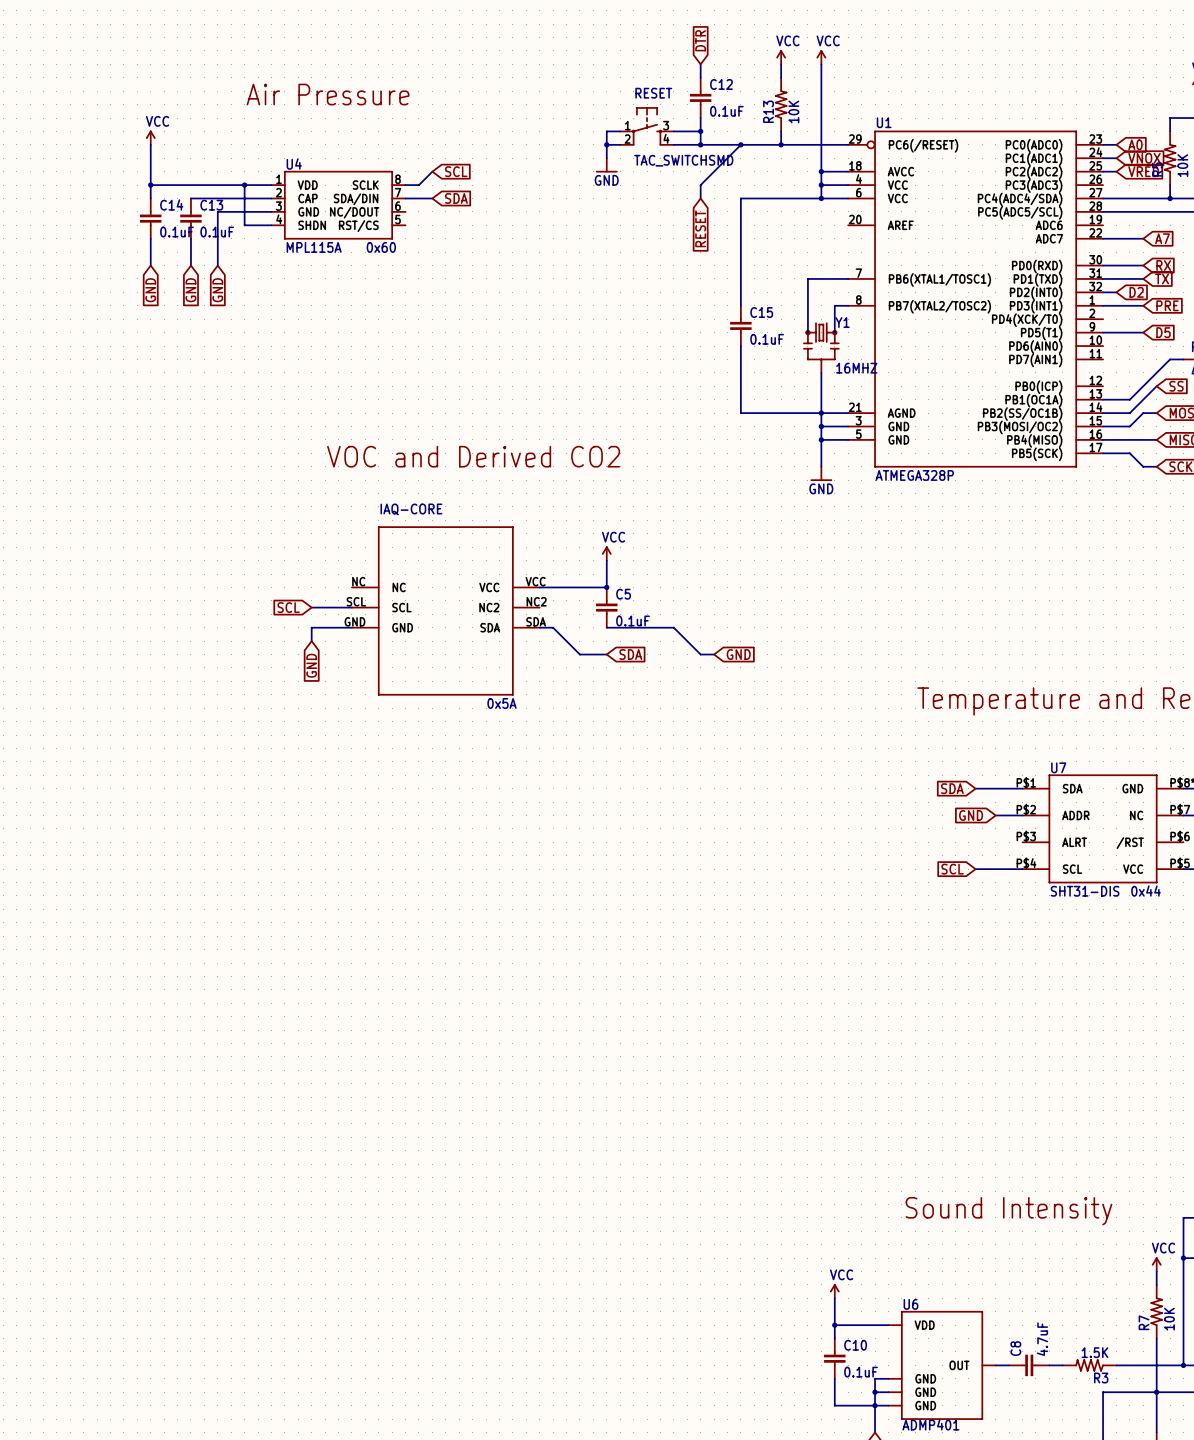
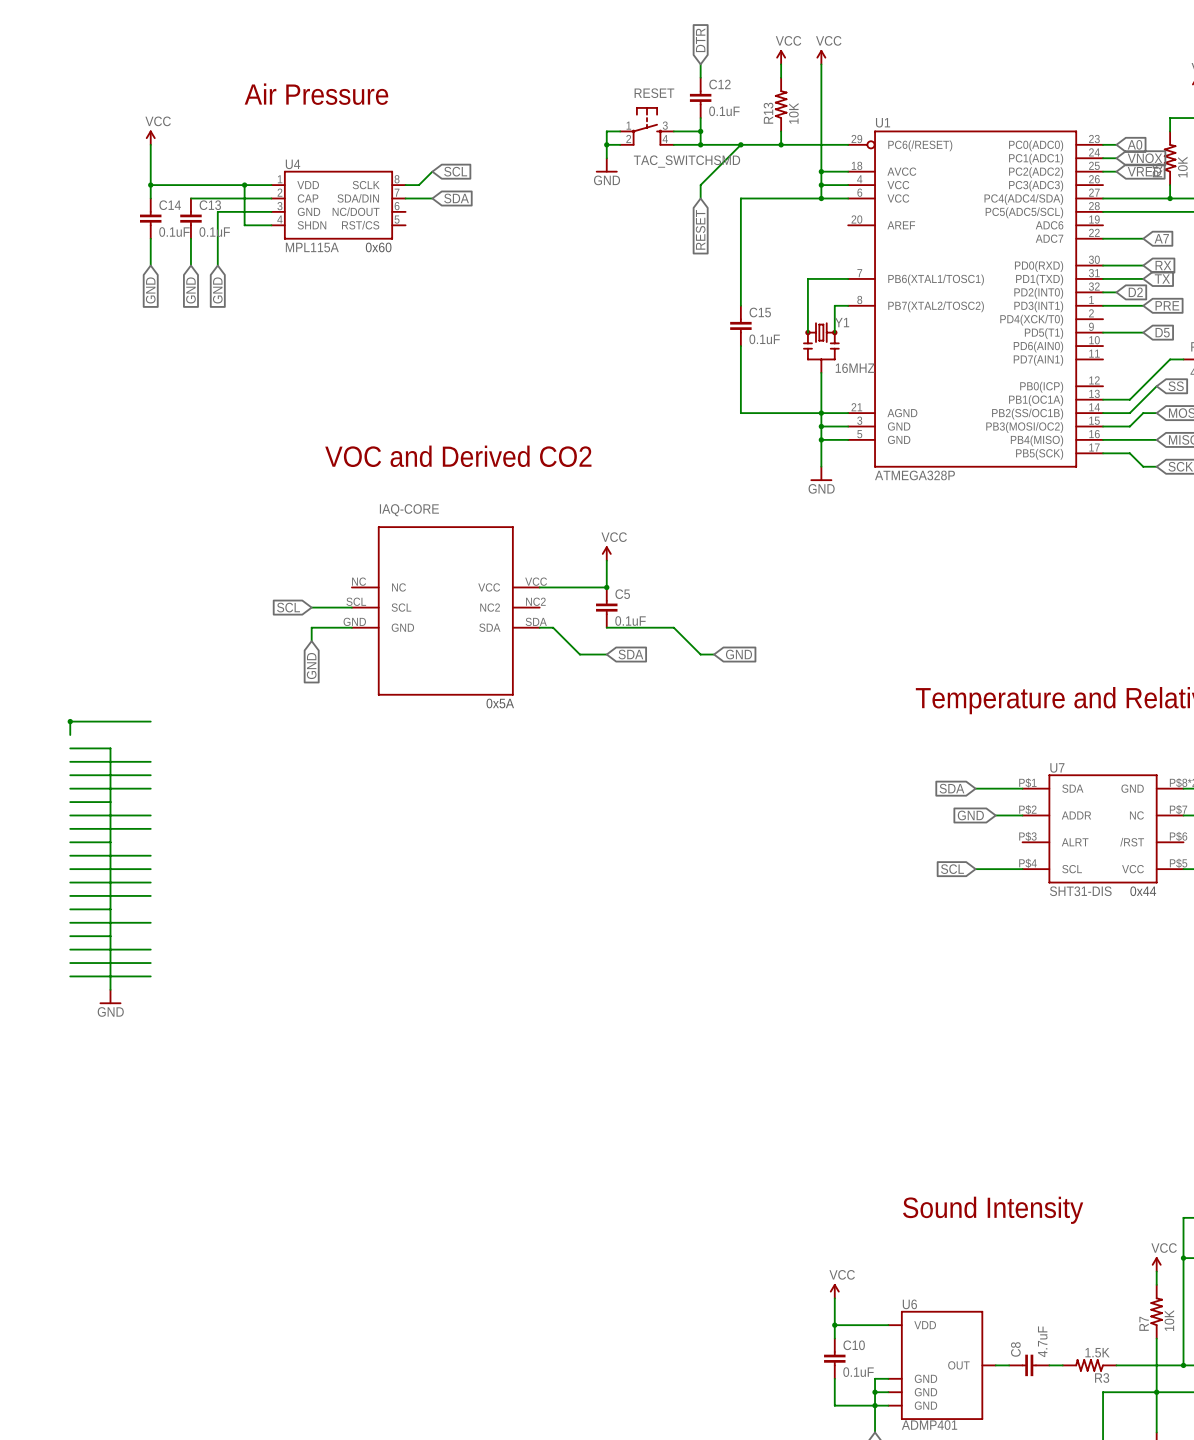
junction: none -> (70, 721)
wire: none -> (150, 721) (70, 721) (70, 735)
wire: none -> (70, 748) (110, 748) (110, 989)
wire: none -> (70, 761) (150, 761)
wire: none -> (70, 775) (150, 775)
wire: none -> (70, 788) (150, 788)
wire: none -> (70, 802) (110, 802)
wire: none -> (70, 815) (150, 815)
wire: none -> (70, 828) (150, 828)
wire: none -> (70, 842) (110, 842)
wire: none -> (70, 855) (150, 855)
wire: none -> (70, 869) (150, 869)
wire: none -> (70, 882) (150, 882)
wire: none -> (70, 895) (150, 895)
wire: none -> (70, 909) (110, 909)
wire: none -> (70, 922) (150, 922)
wire: none -> (70, 936) (110, 936)
wire: none -> (70, 949) (150, 949)
wire: none -> (70, 963) (150, 963)
wire: none -> (70, 976) (150, 976)
power symbol: none -> GND (110, 996)

